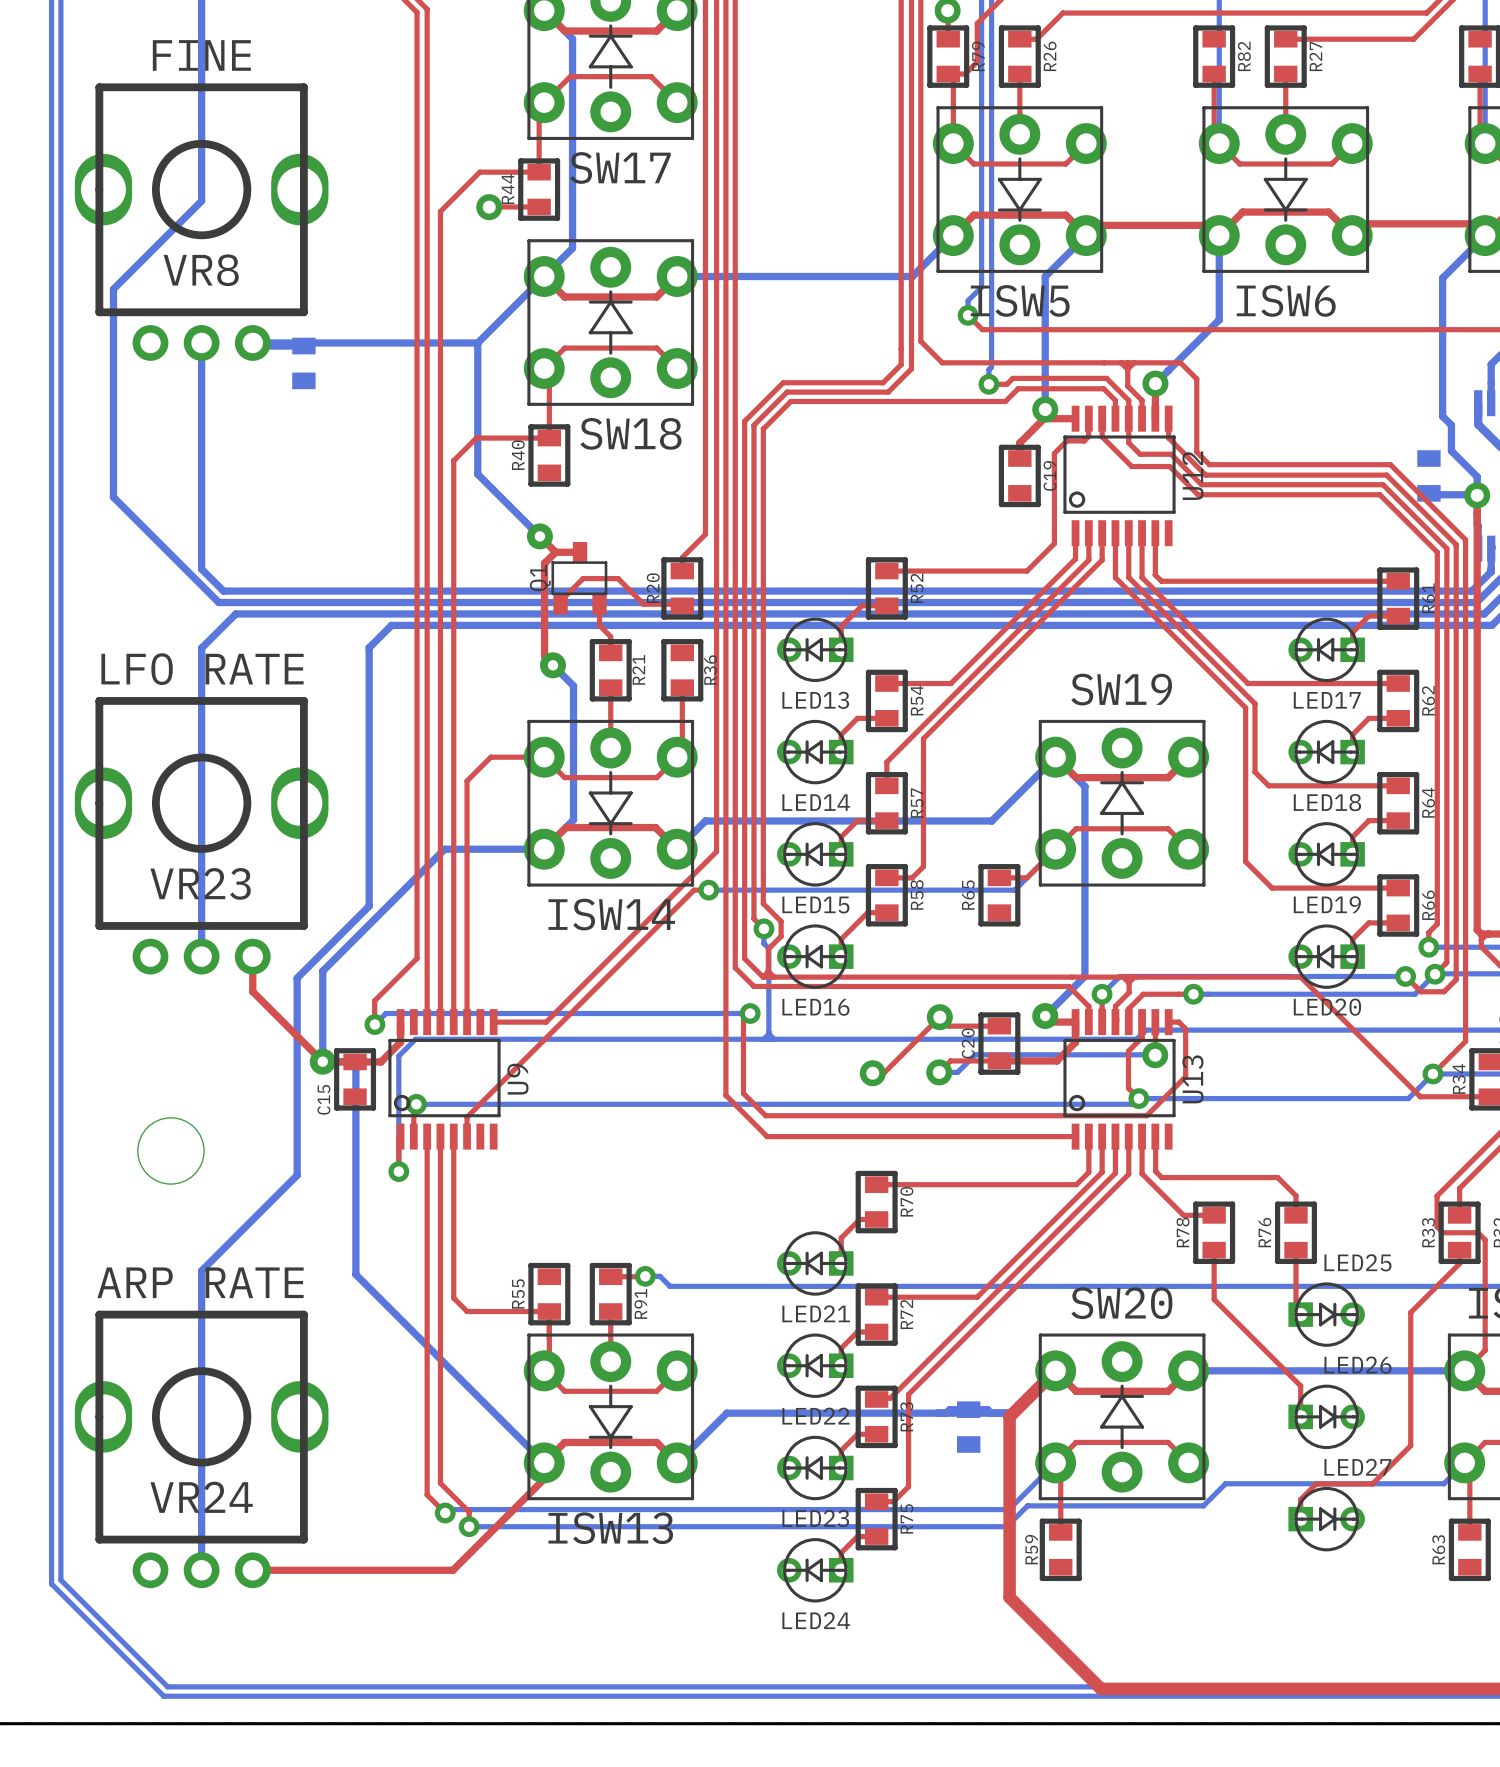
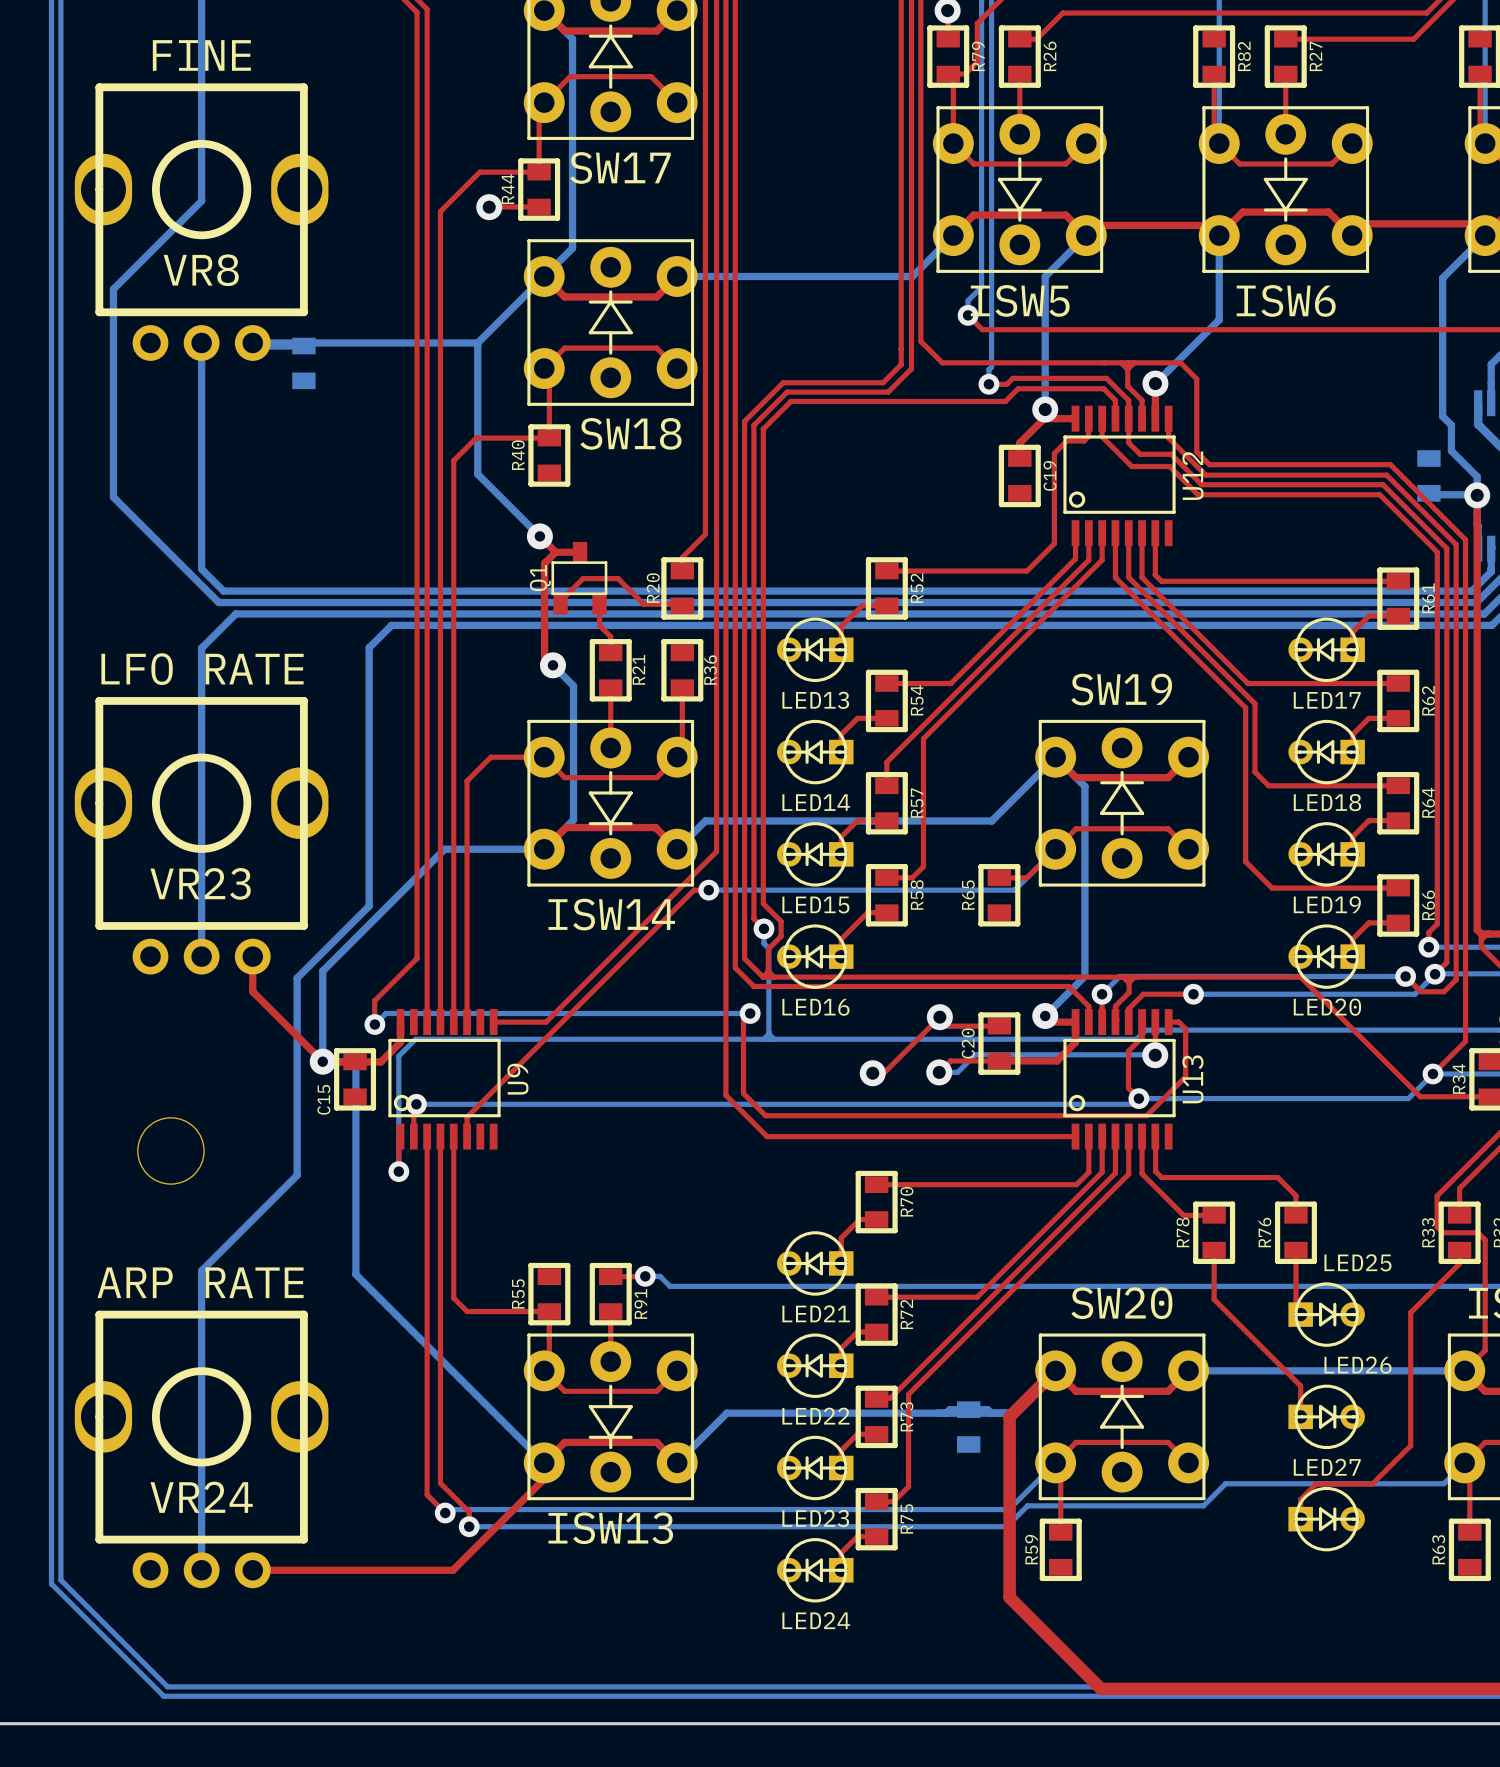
LED27 name position: LED27 (1357, 1467) -> LED27 (1327, 1467)

